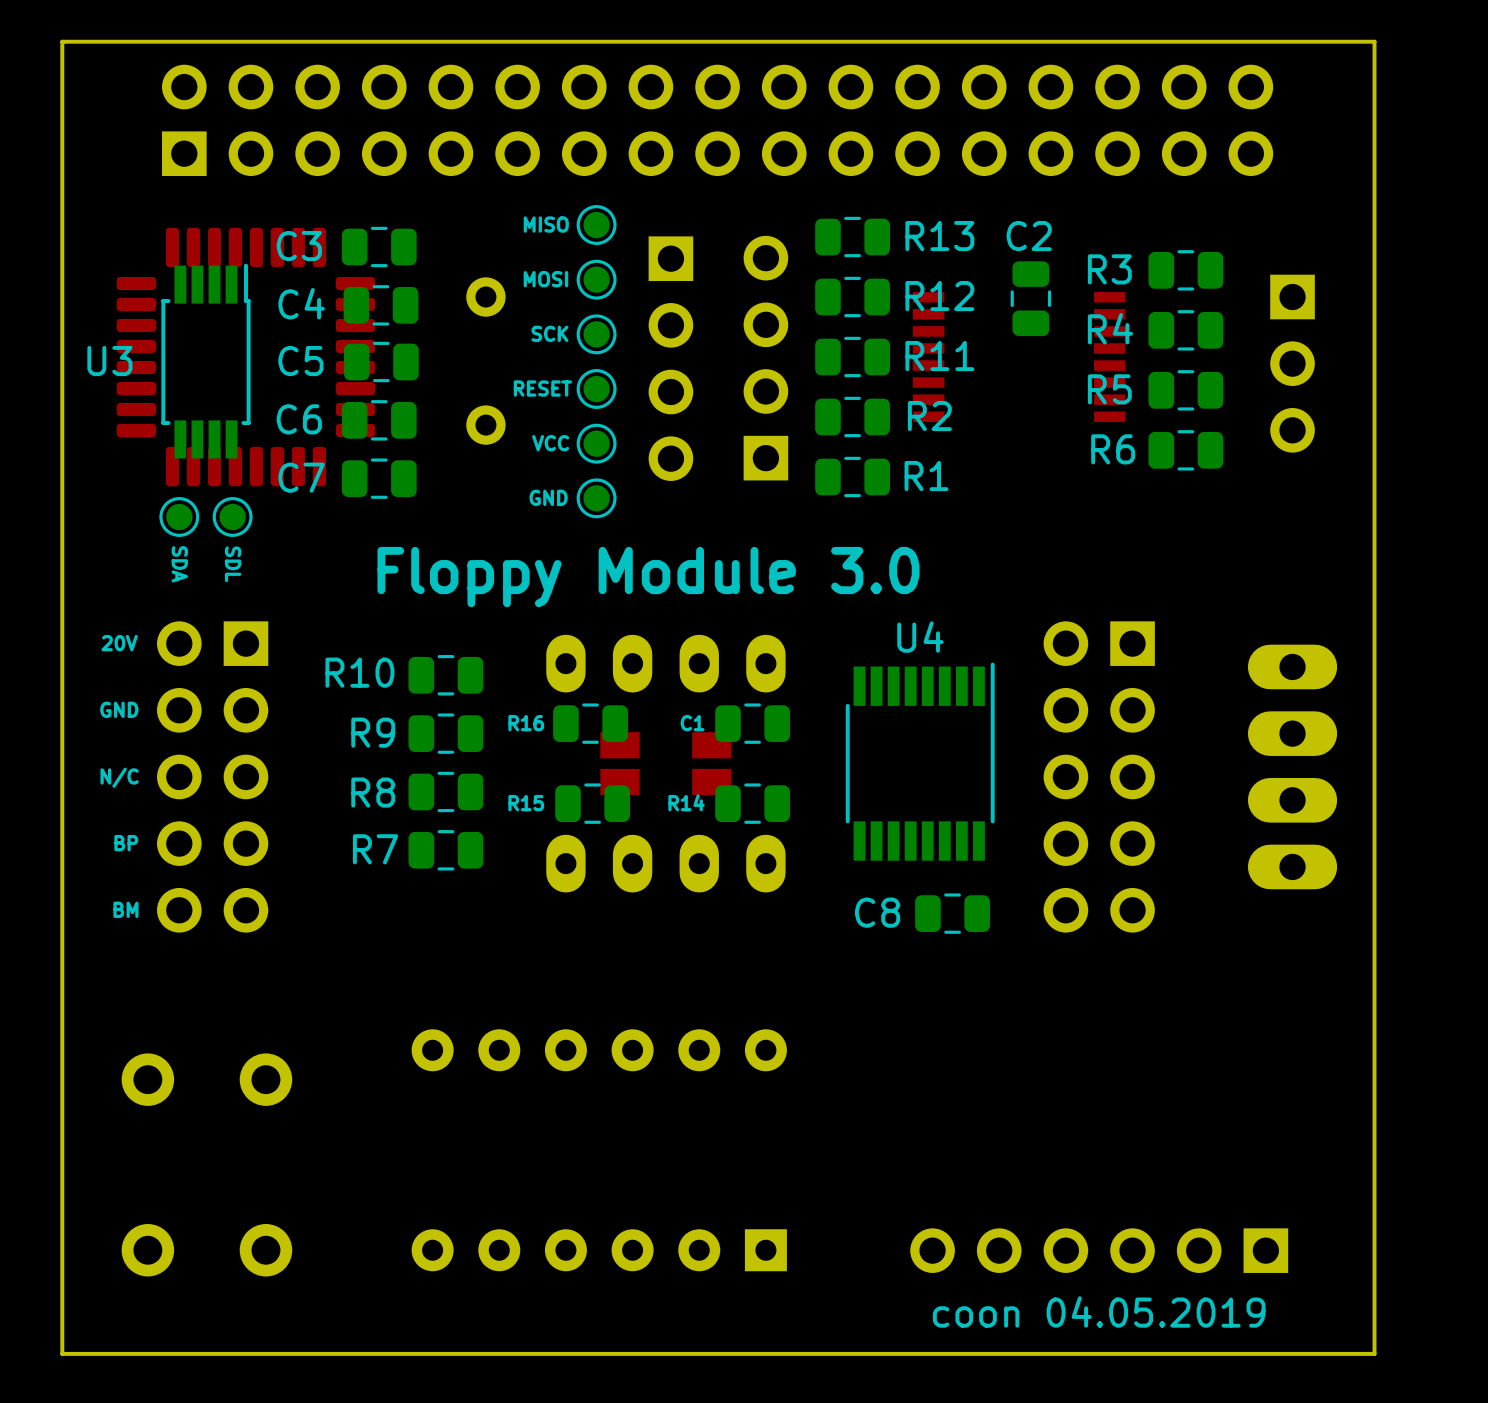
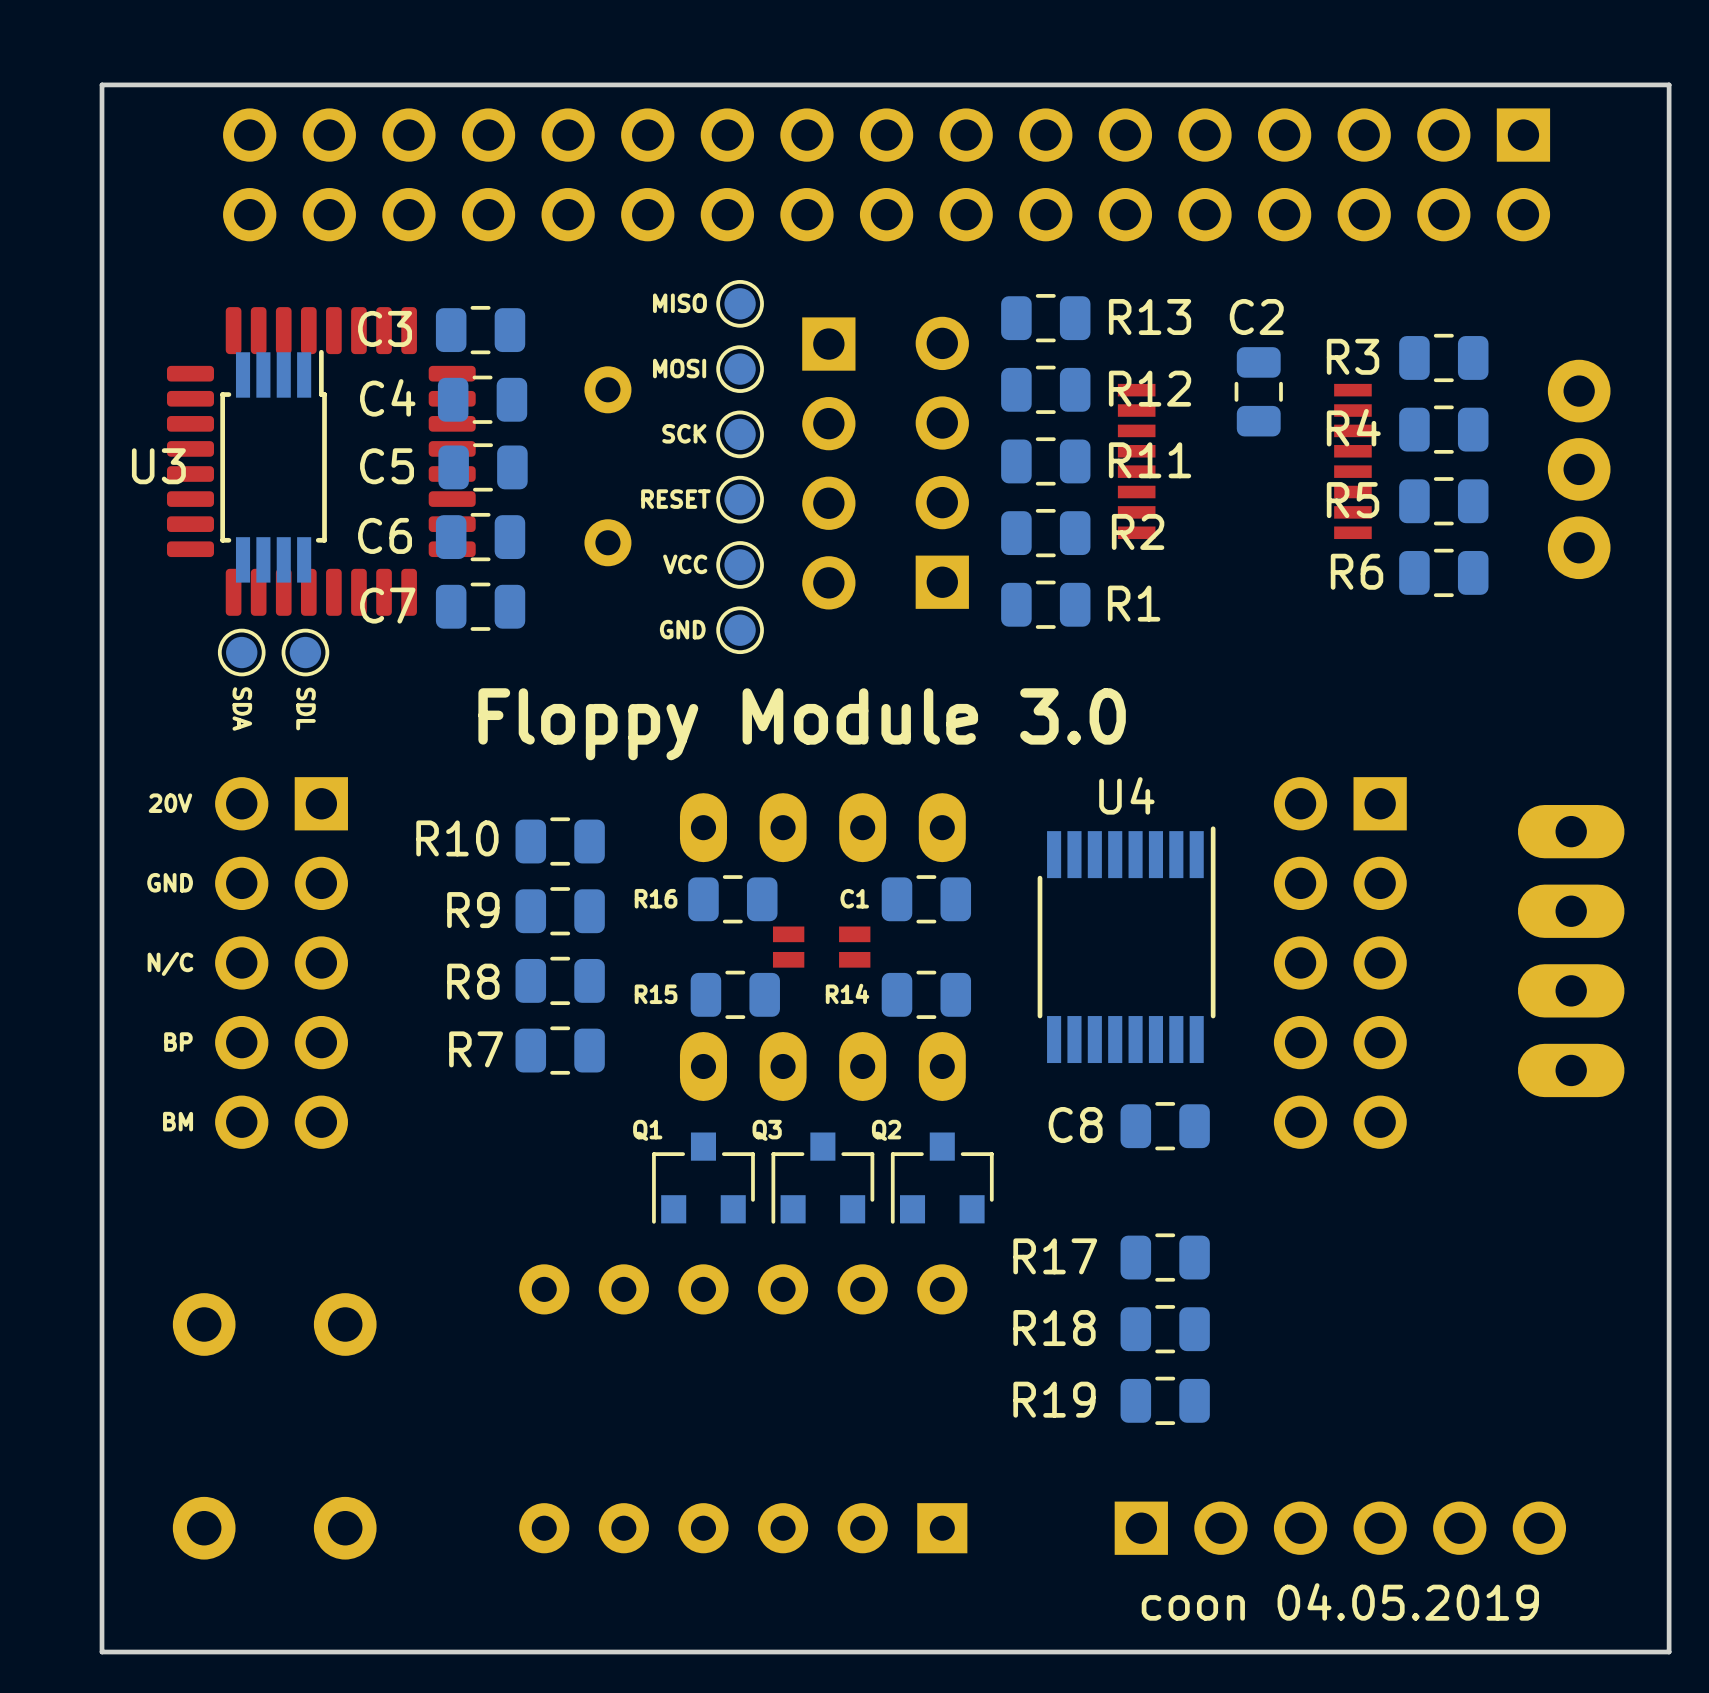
part rotation: 0° (717, 120) -> 180° (886, 174)
part footprint: [1270, 274, 1315, 453] -> [1547, 359, 1611, 580]
part footprint: [600, 732, 732, 796] -> [772, 926, 871, 968]
Q1: none -> (703, 1178)
Q3: none -> (822, 1178)
Q2: none -> (942, 1178)
R17: none -> (1165, 1257)
R18: none -> (1165, 1329)
R19: none -> (1165, 1400)
part rotation: 0° (1099, 1250) -> 180° (1340, 1528)

